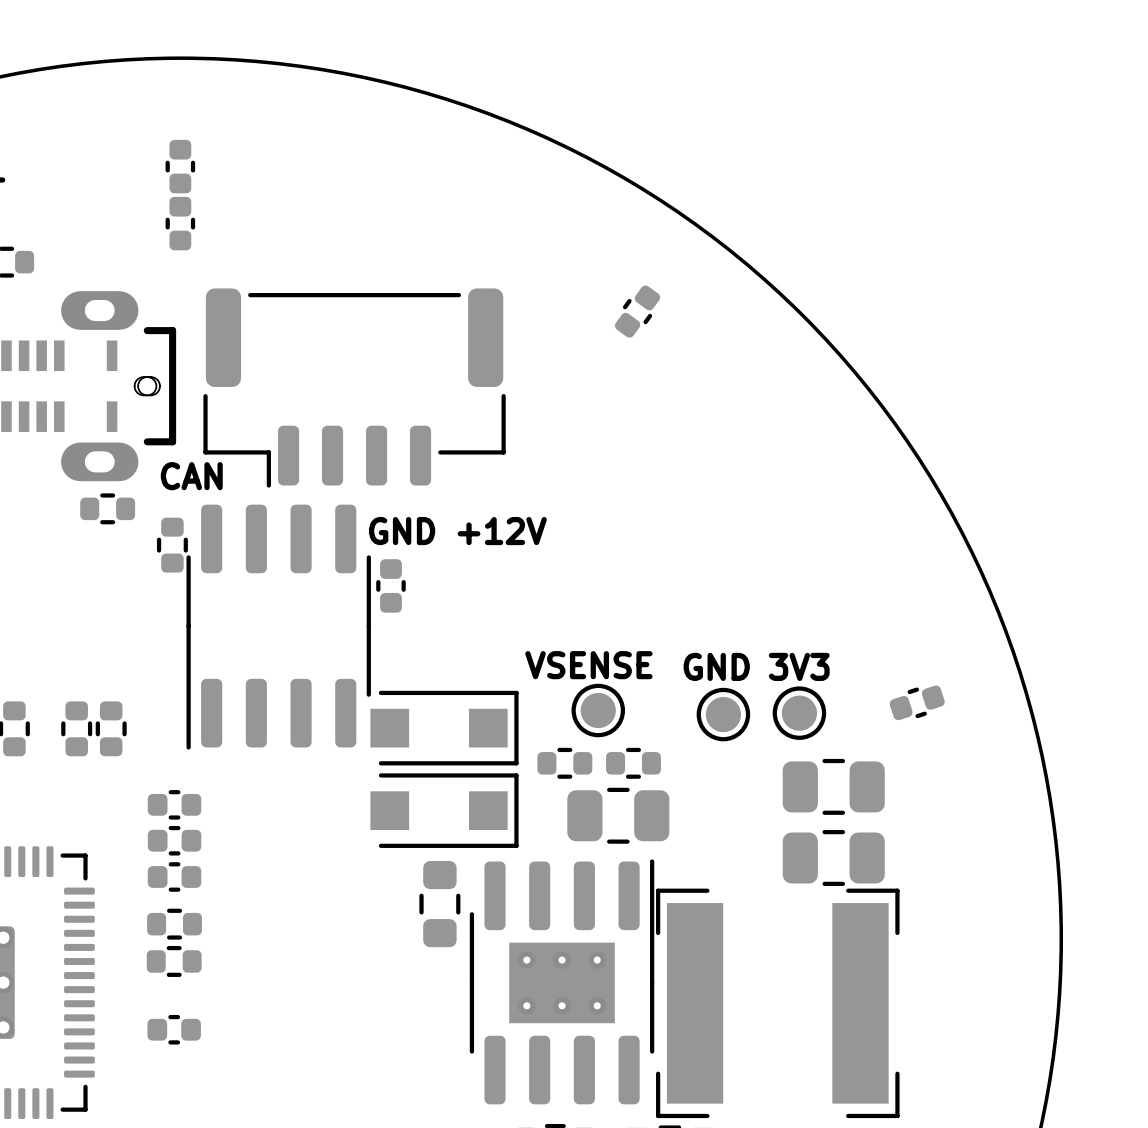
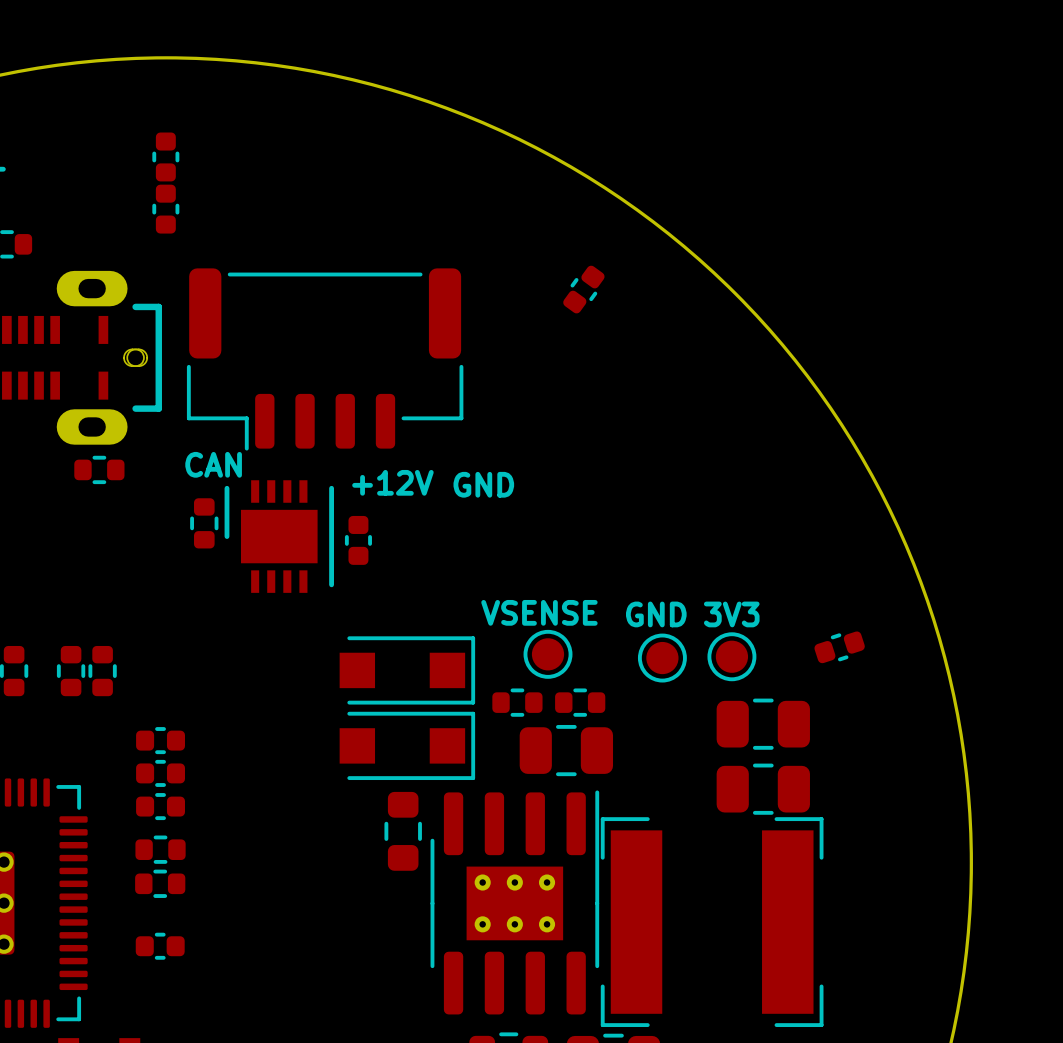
text position: CAN (191, 476) -> CAN (213, 464)
text position: GND (402, 531) -> GND (483, 484)
text position: +12V (502, 531) -> +12V (392, 482)
part position: (172, 545) -> (204, 523)
part: none -> (279, 536)
part: (278, 627) -> none

